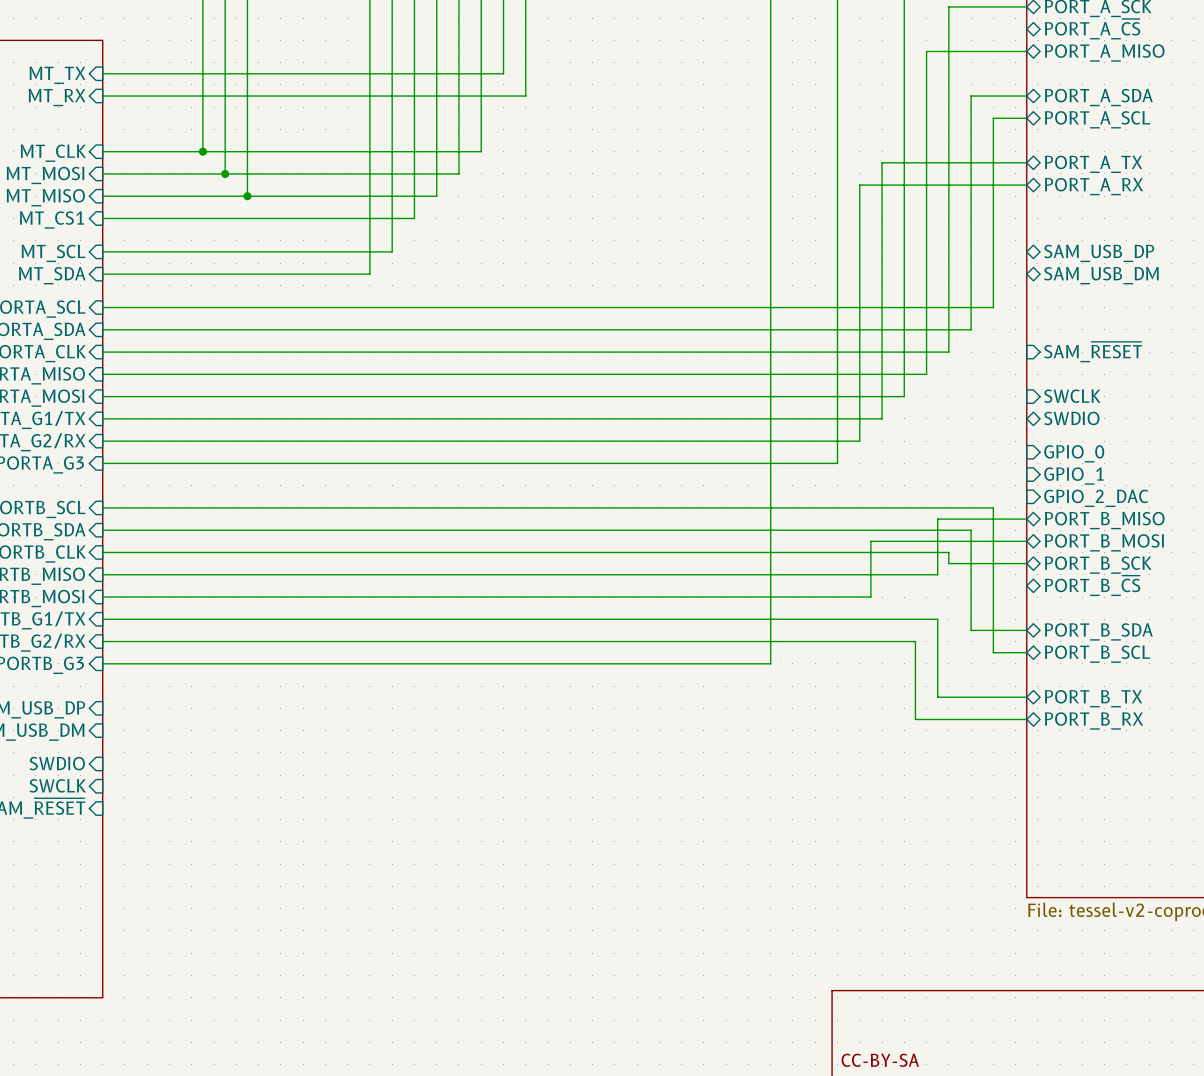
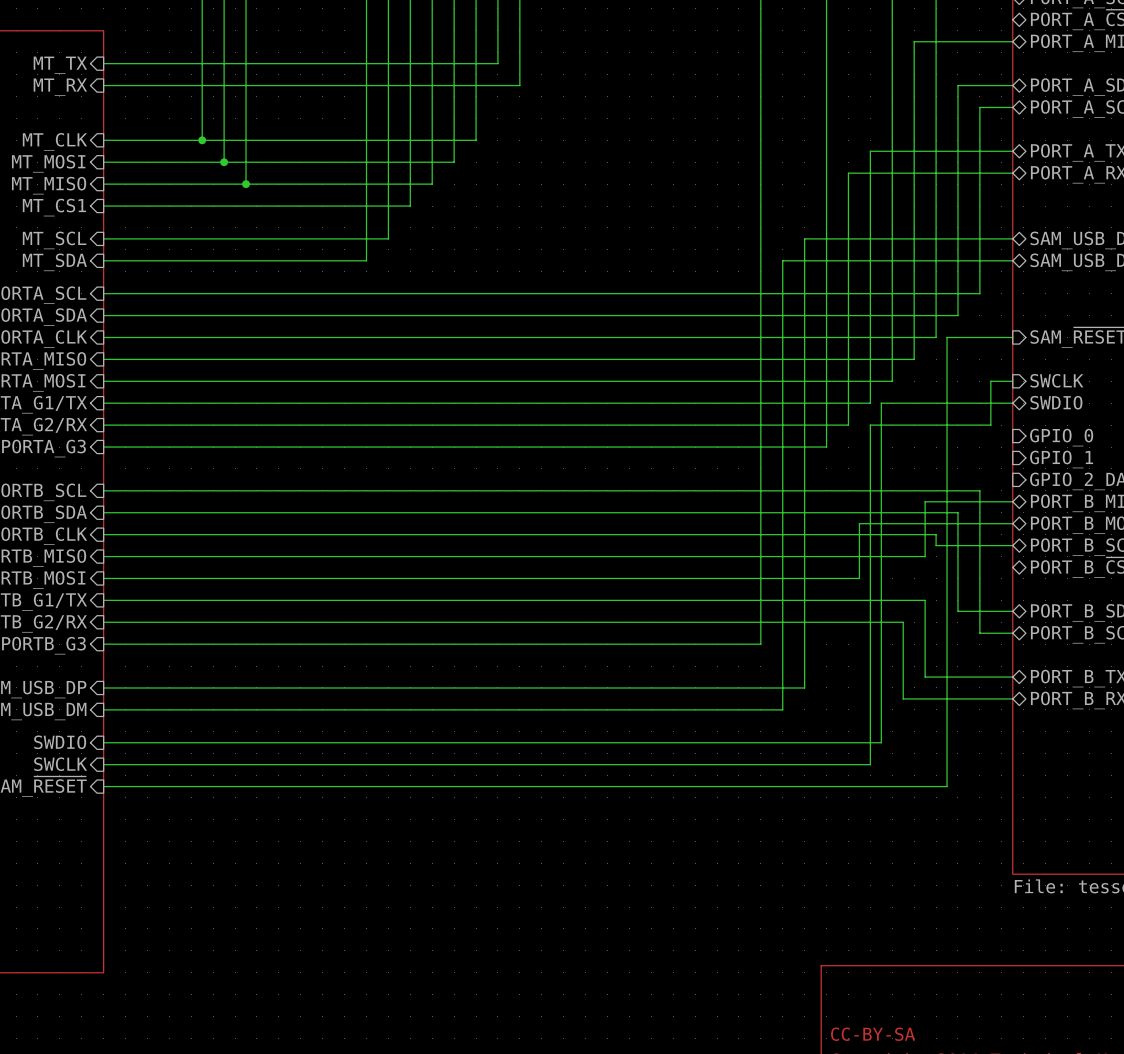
wire: none -> (1012, 238) (804, 238) (804, 687) (103, 687)
wire: none -> (1012, 260) (782, 260) (782, 709) (103, 709)
wire: none -> (1012, 337) (947, 337) (947, 786) (103, 786)
wire: none -> (1012, 381) (990, 381) (990, 425) (870, 425) (870, 764) (103, 764)
wire: none -> (1012, 403) (881, 403) (881, 742) (103, 742)

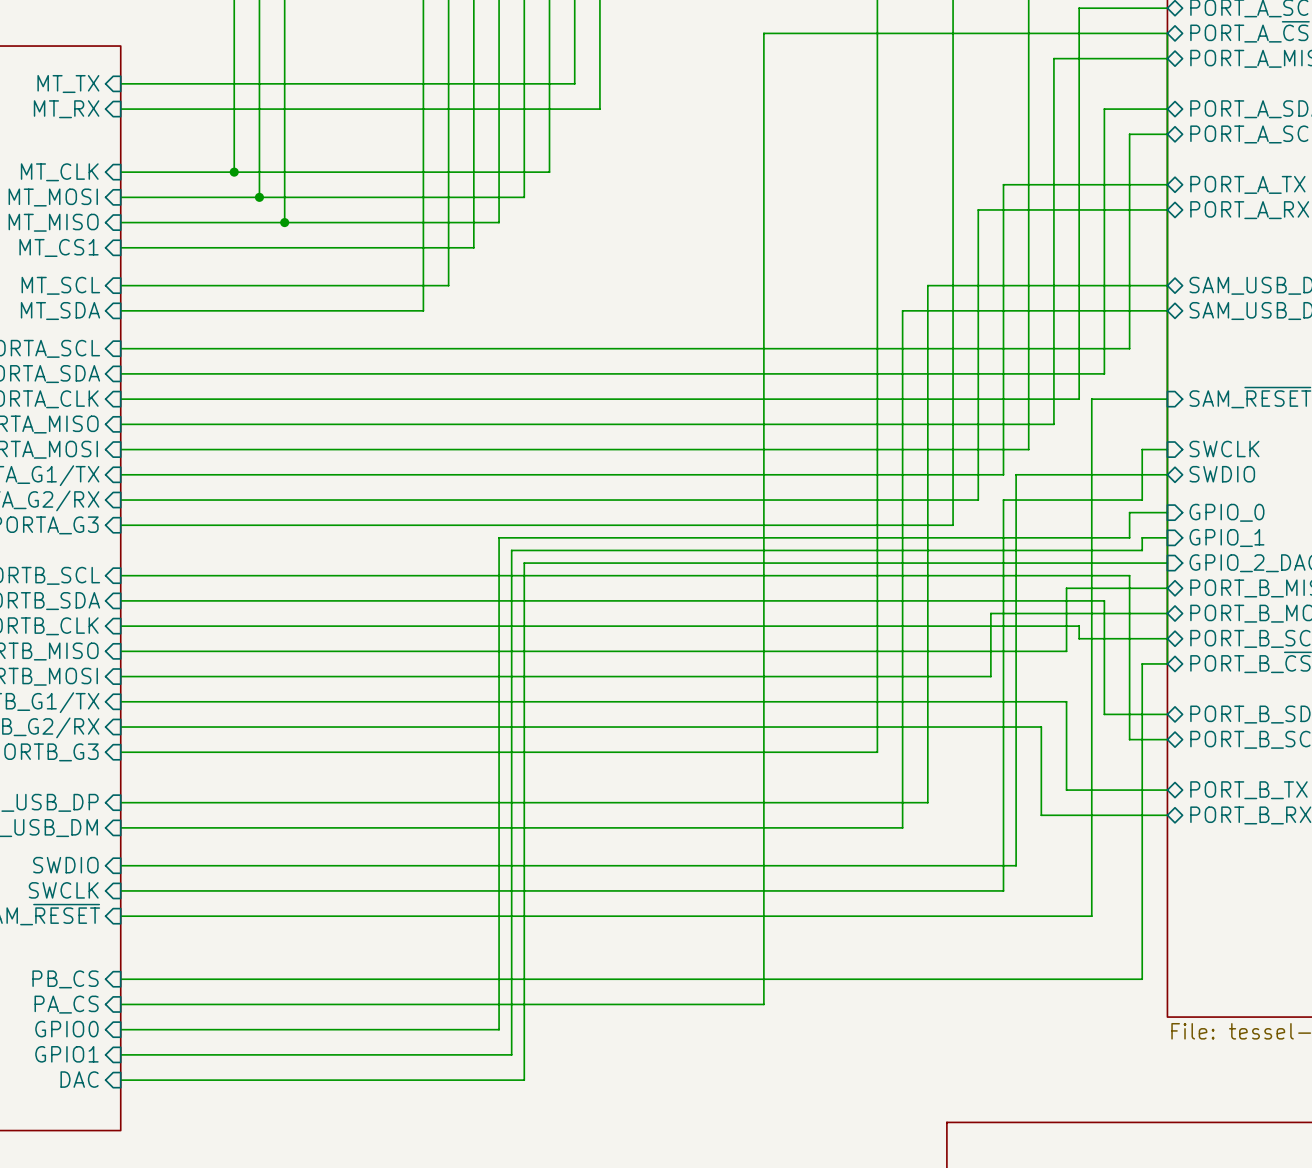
wire: none -> (1167, 512) (1129, 512) (1129, 537) (499, 537) (499, 1029) (120, 1029)
wire: none -> (1167, 537) (1142, 537) (1142, 550) (511, 550) (511, 1054) (120, 1054)
wire: none -> (1167, 563) (524, 563) (524, 1080) (120, 1080)
wire: none -> (120, 979) (1142, 979) (1142, 663) (1167, 663) (1167, 33) (763, 33) (763, 1004) (120, 1004)
sheet pin: none -> PB_CS (65, 979)
sheet pin: none -> PA_CS (66, 1004)
sheet pin: none -> GPIO0 (66, 1029)
sheet pin: none -> GPIO1 (66, 1054)
sheet pin: none -> DAC (79, 1079)

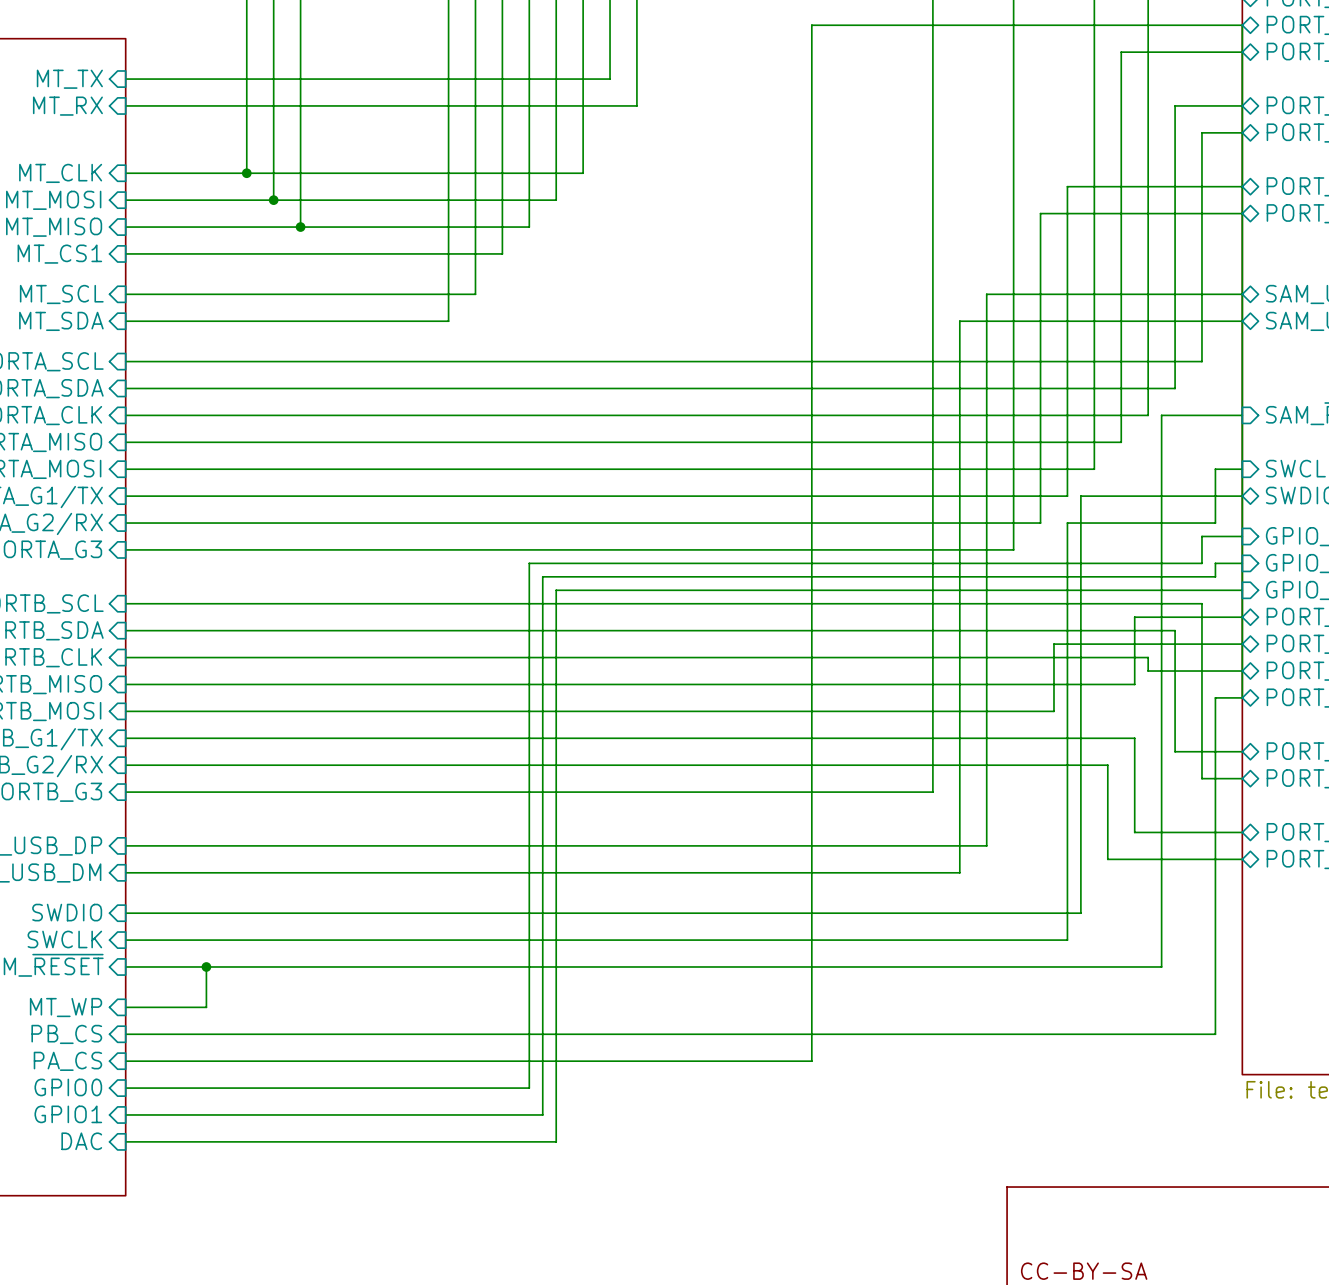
wire: none -> (206, 966) (206, 1007) (125, 1007)
junction: none -> (206, 966)
sheet pin: none -> MT_WP (66, 1007)

